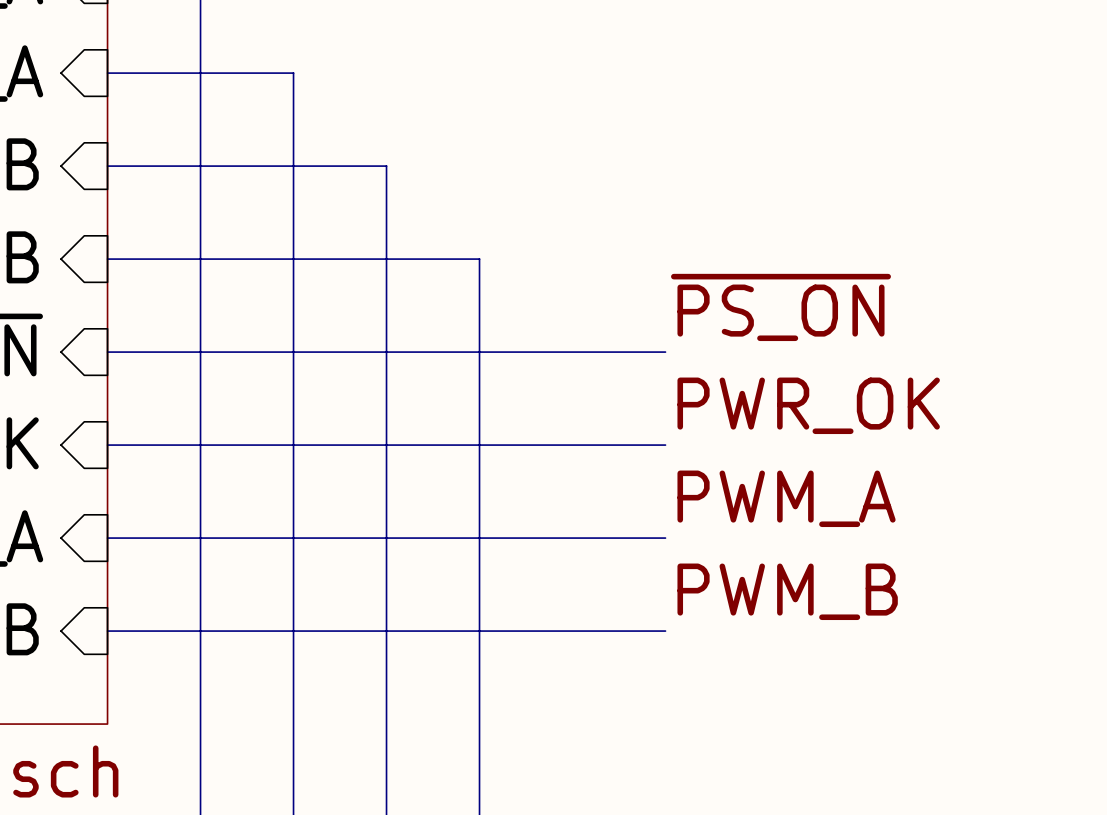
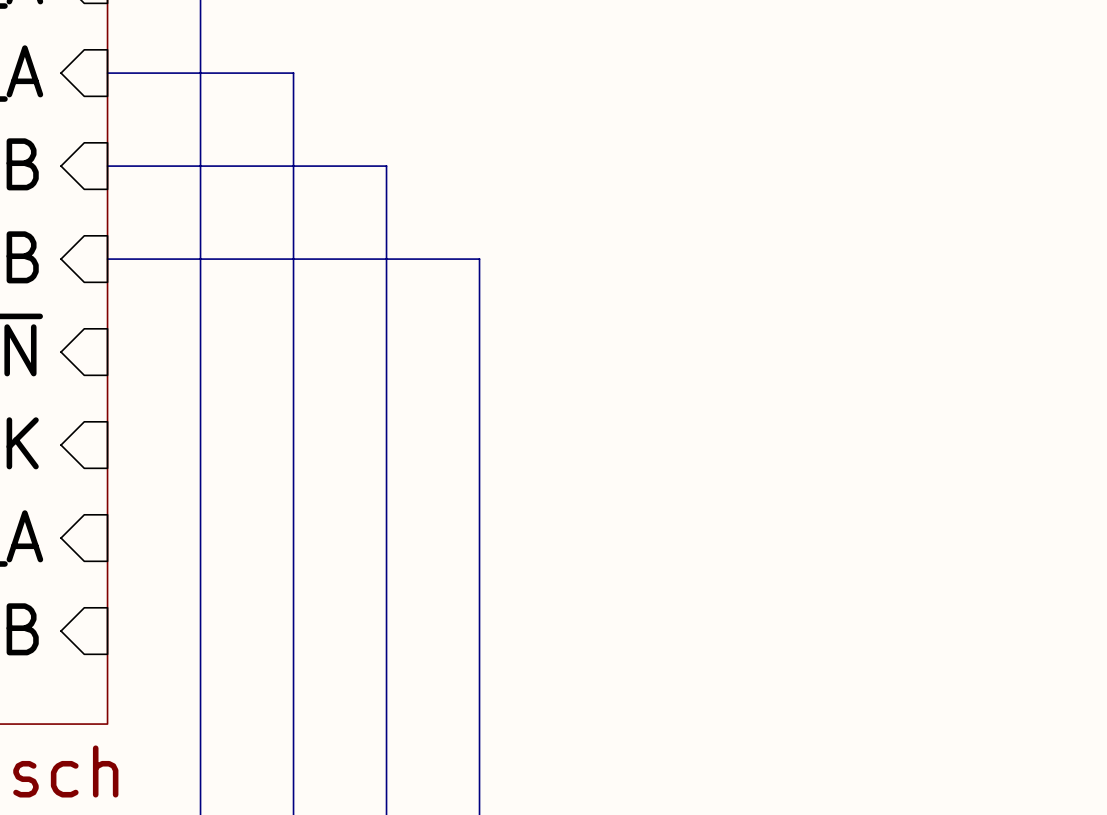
label: ~{PS_ON} (780, 307) -> none
wire: (107, 352) (665, 352) -> none
label: PWR_OK (808, 405) -> none
wire: (107, 445) (665, 445) -> none
label: PWM_A (786, 498) -> none
wire: (107, 538) (665, 538) -> none
label: PWM_B (787, 591) -> none
wire: (107, 631) (665, 631) -> none

